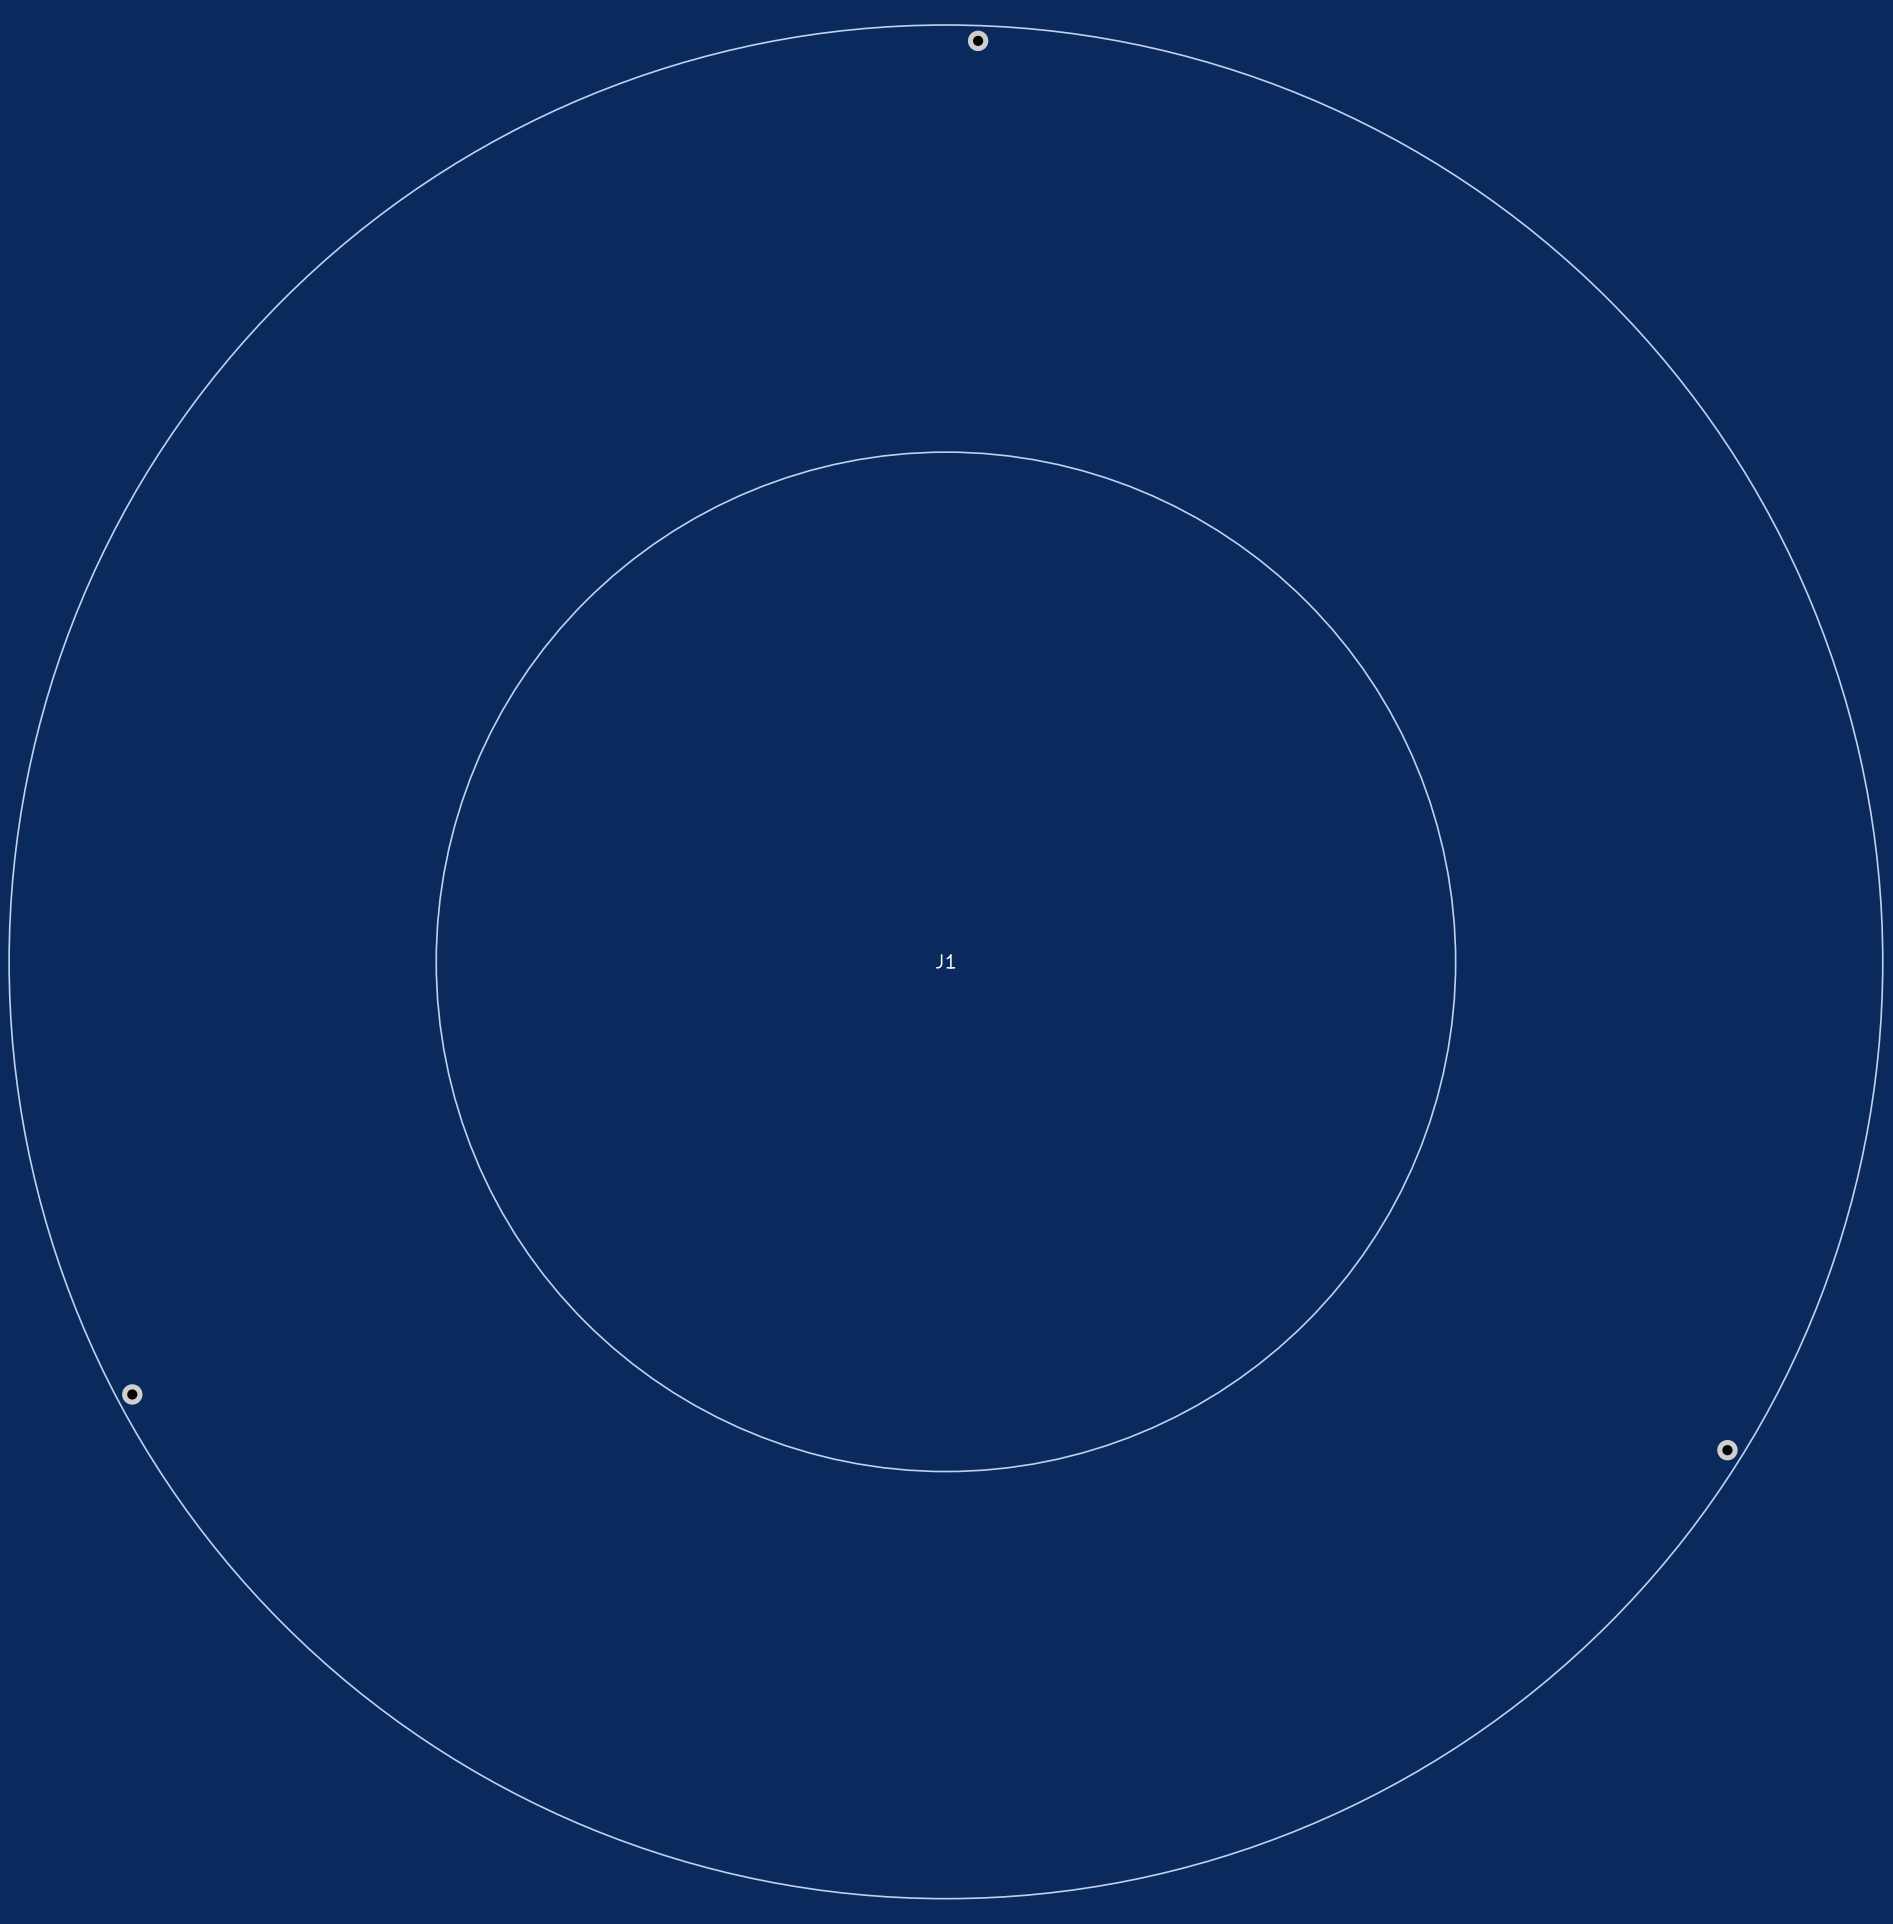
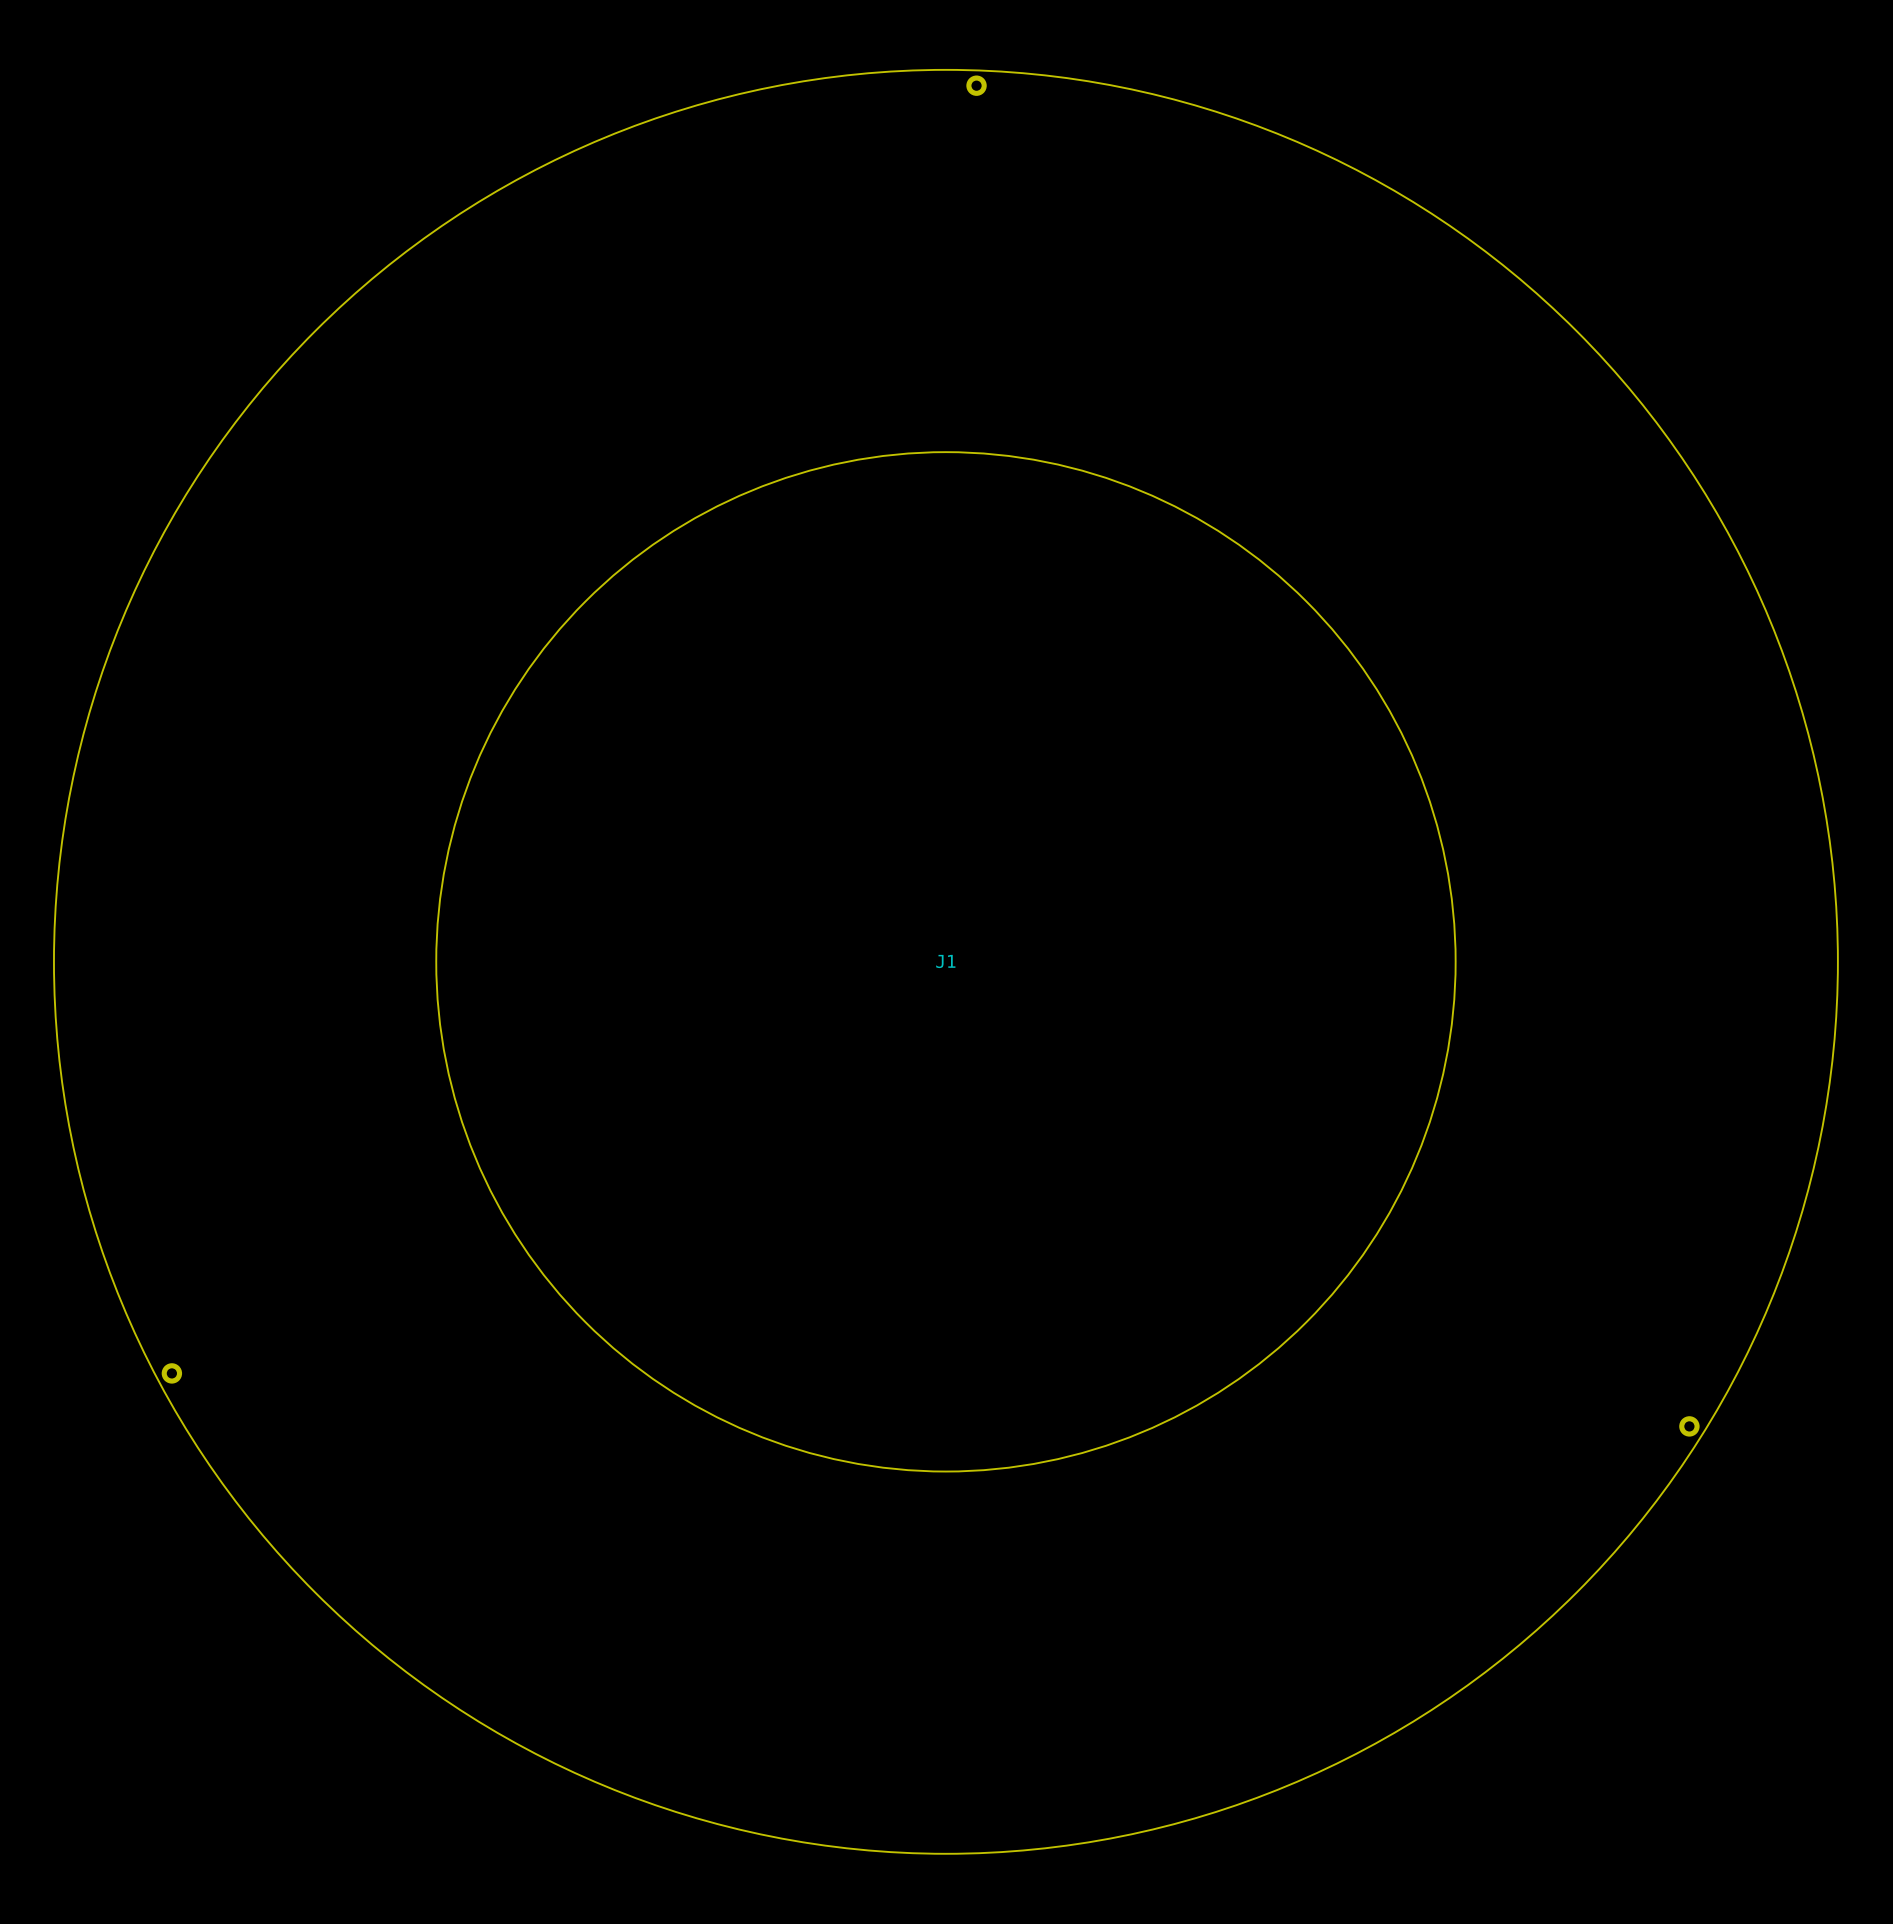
round board edge size: [8, 24, 1884, 1900] -> [53, 69, 1839, 1855]
J1 footprint: [122, 30, 1738, 1461] -> [161, 75, 1700, 1437]

